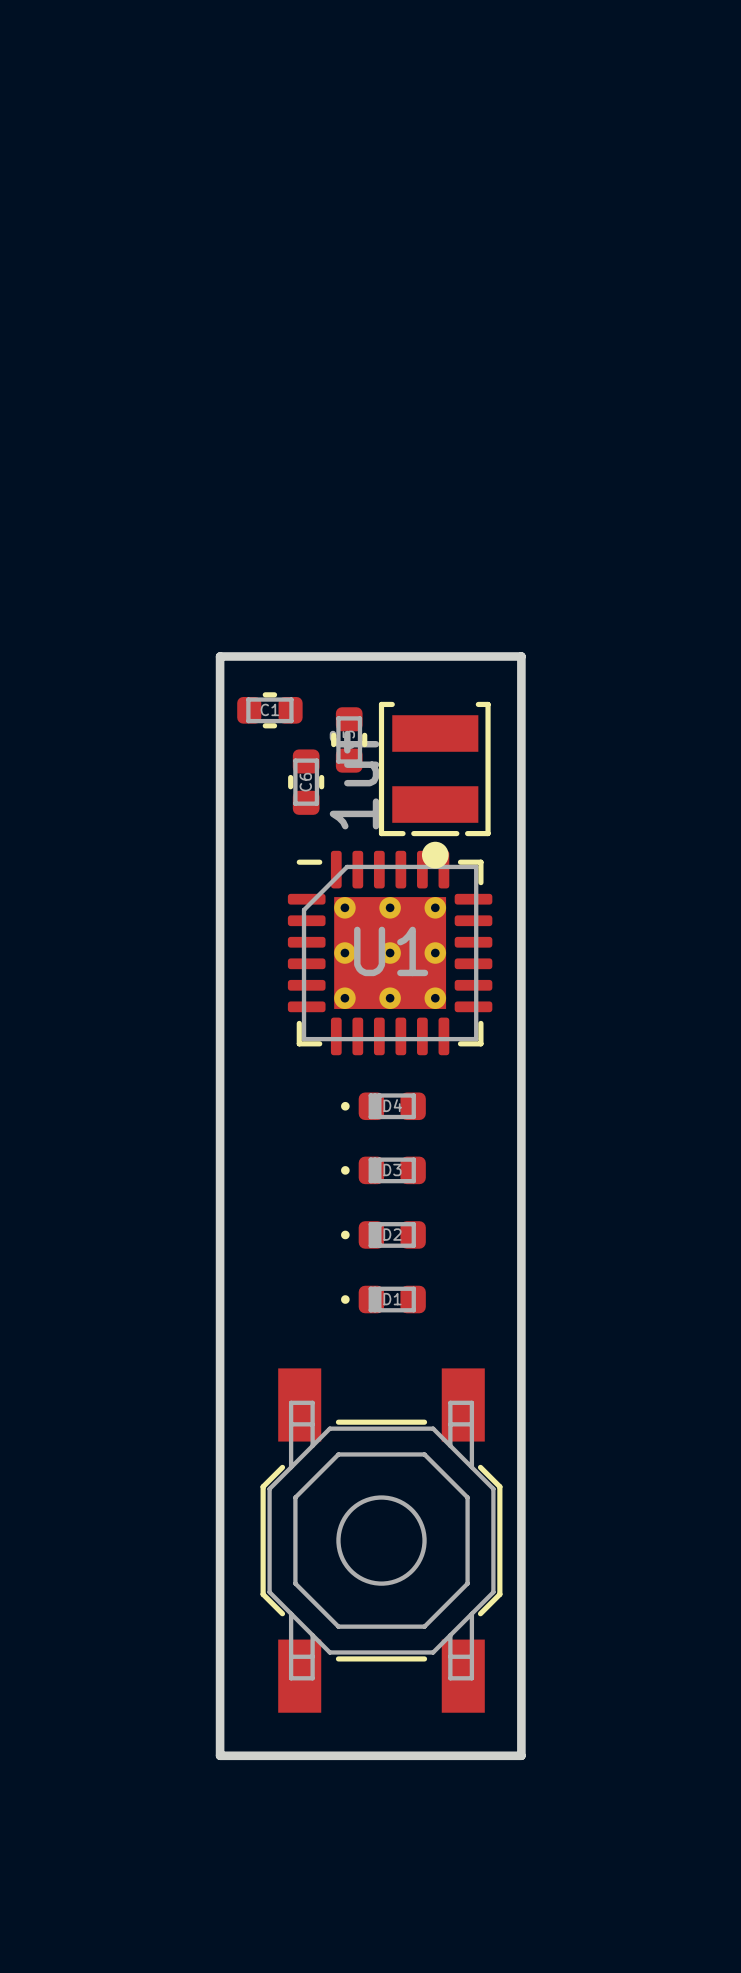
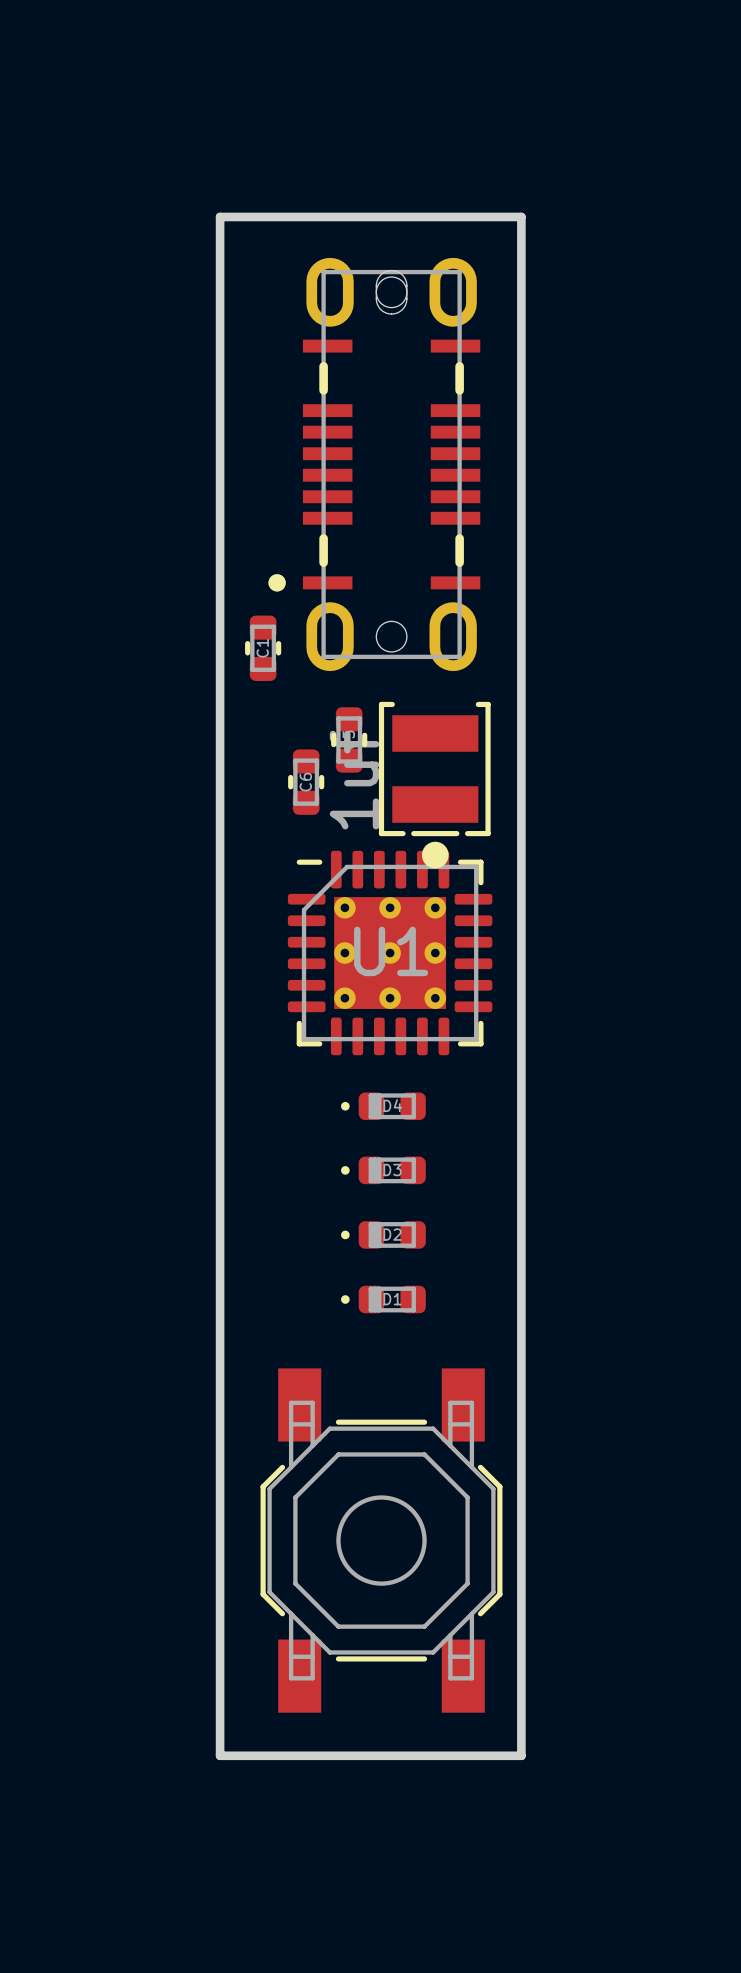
part: none -> (374, 464)
board edge: (220, 656) (521, 656) -> (220, 656) (220, 216) (521, 216) (521, 656)
C1 rotation: 0° (269, 710) -> 90° clockwise (263, 648)
C1 position: (269, 710) -> (263, 648)

